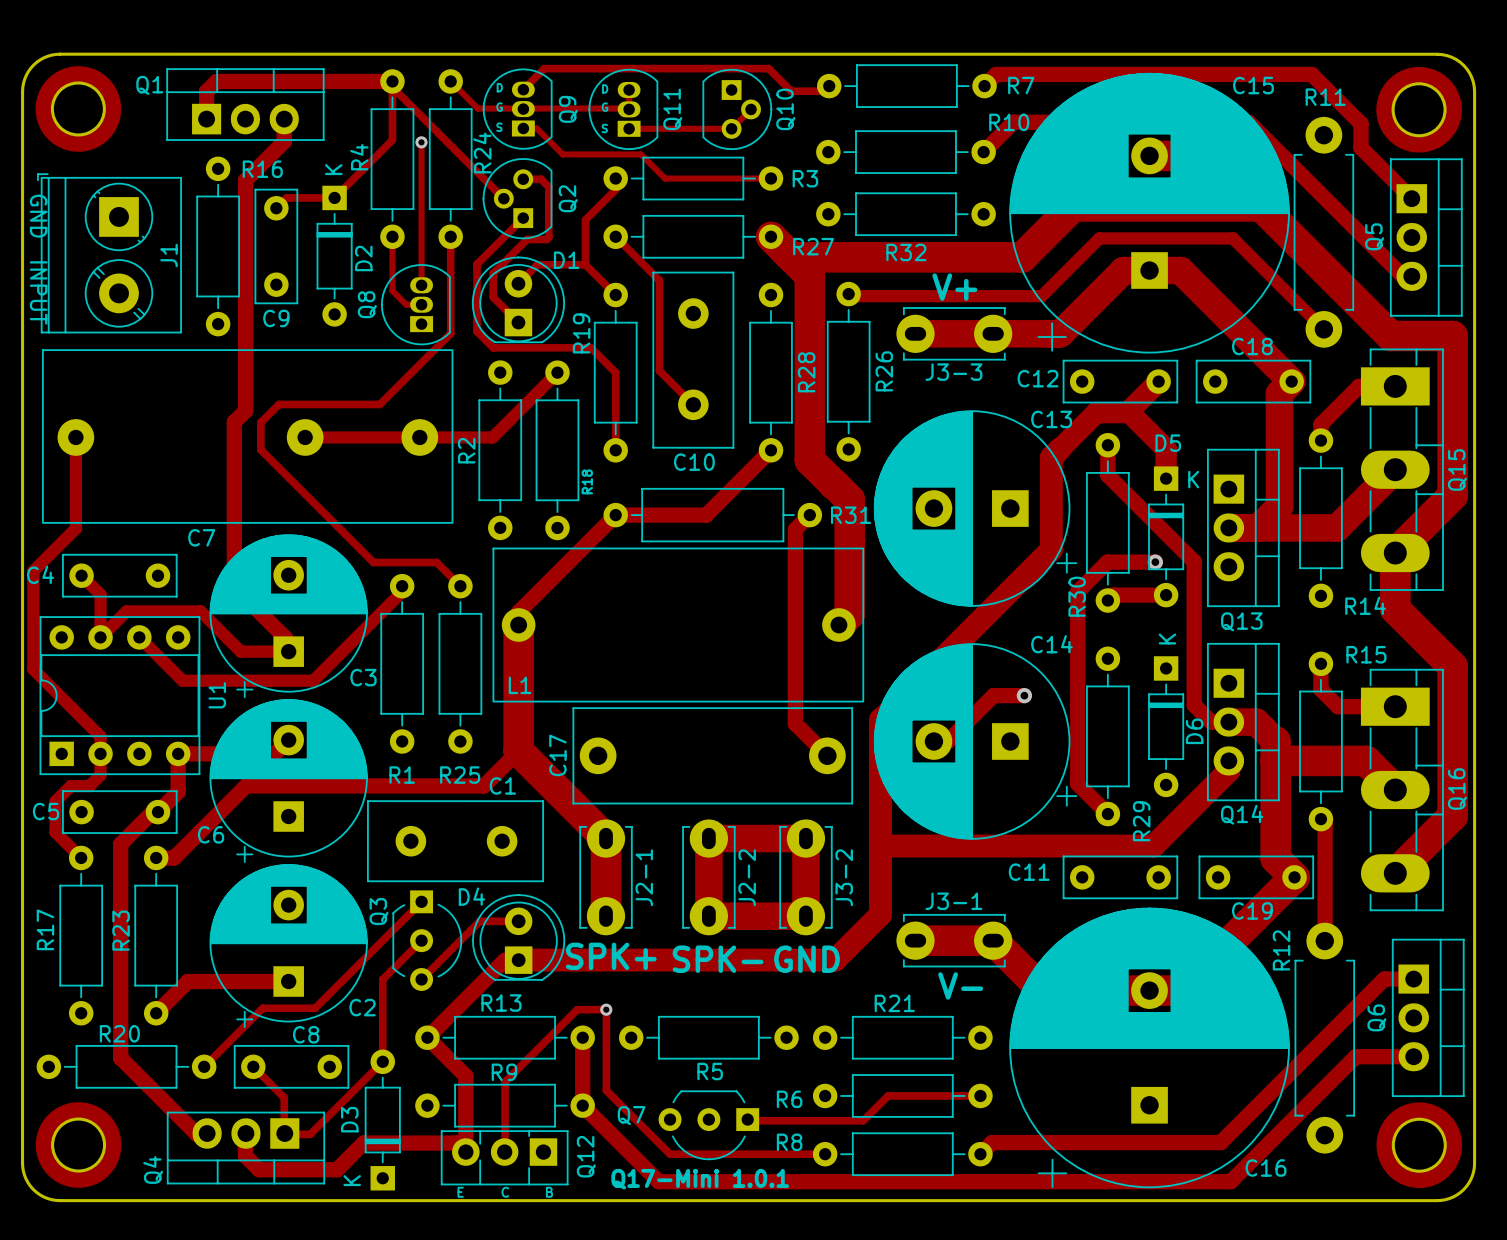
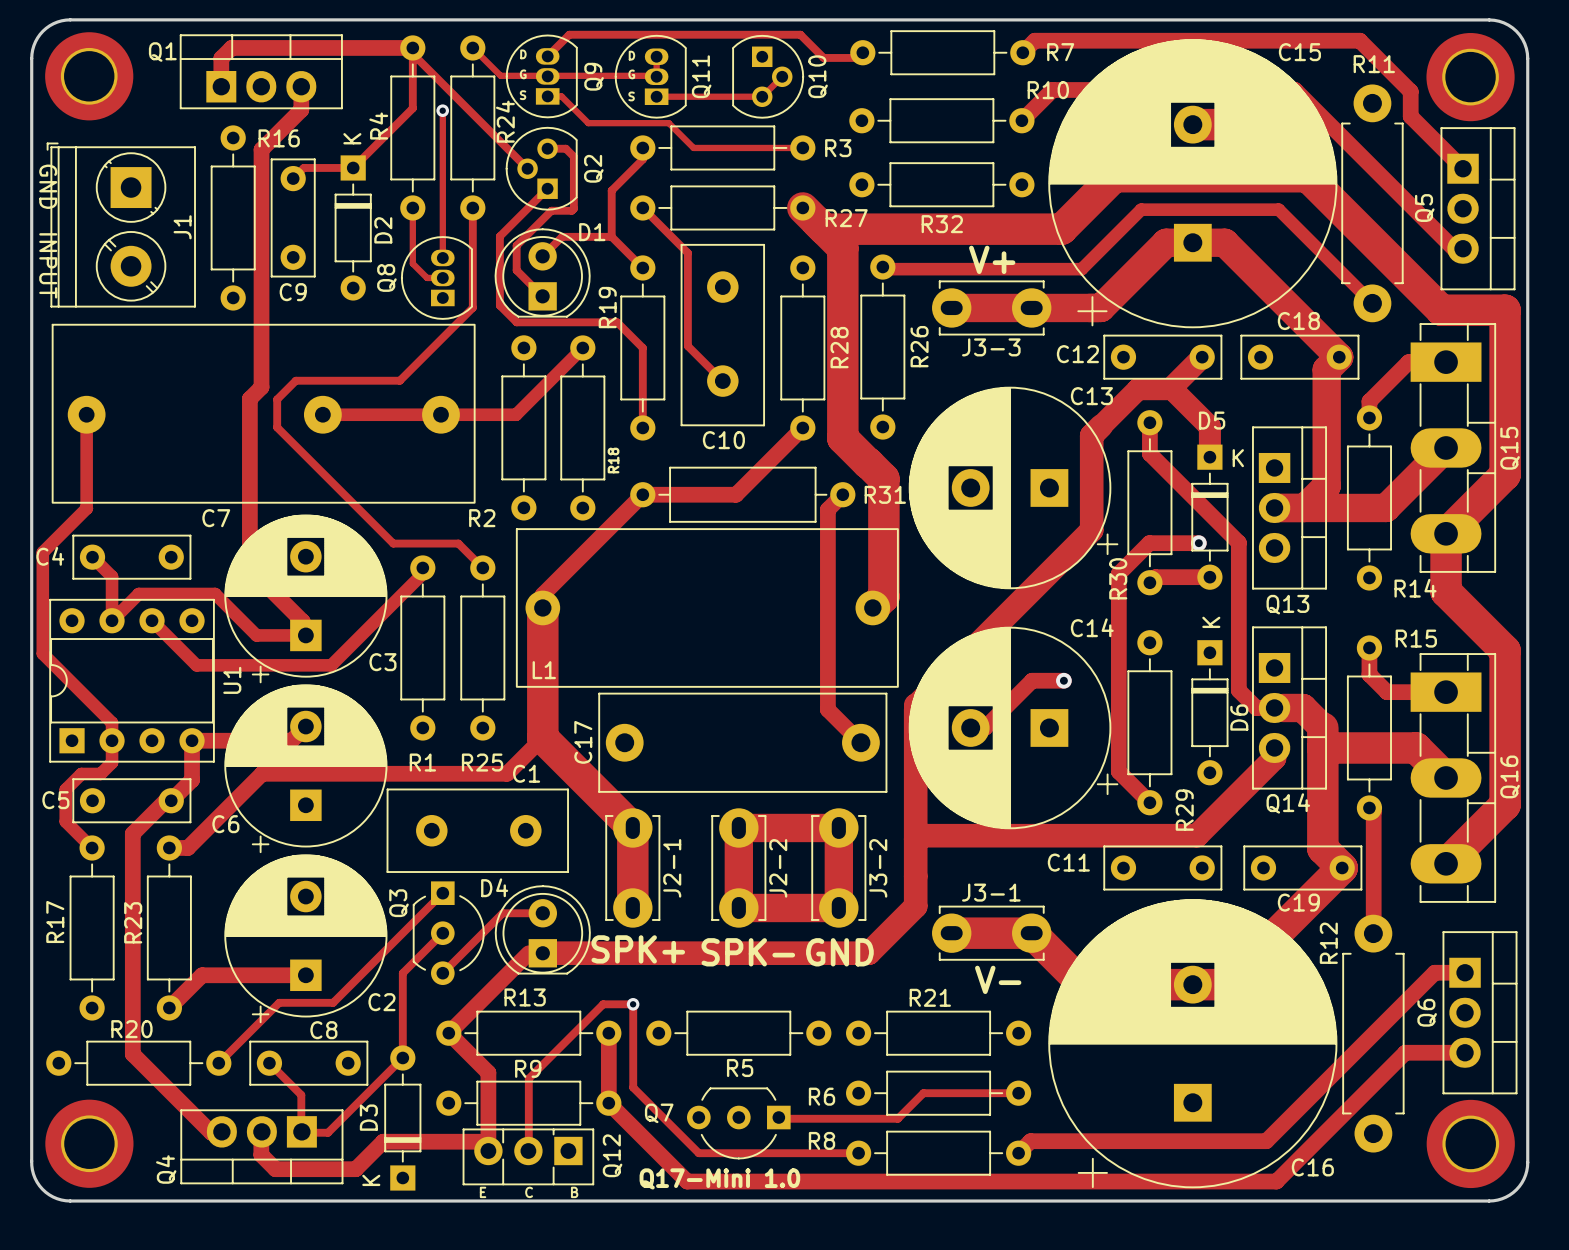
R2 name rotation: 0° (466, 450) -> 90° clockwise (482, 518)
R2 name position: R2 (466, 450) -> R2 (482, 518)
text: Q17-Mini 1.0.1 (700, 1179) -> Q17-Mini 1.0 (719, 1178)

